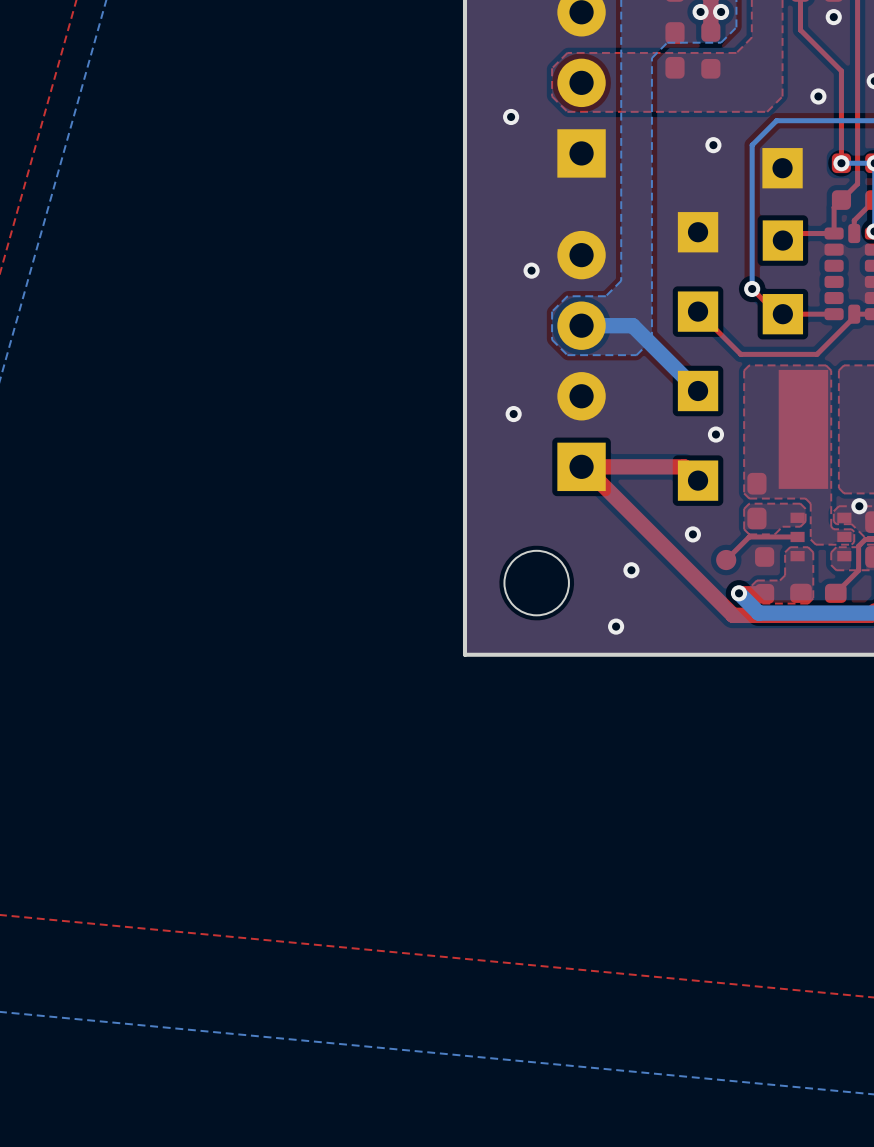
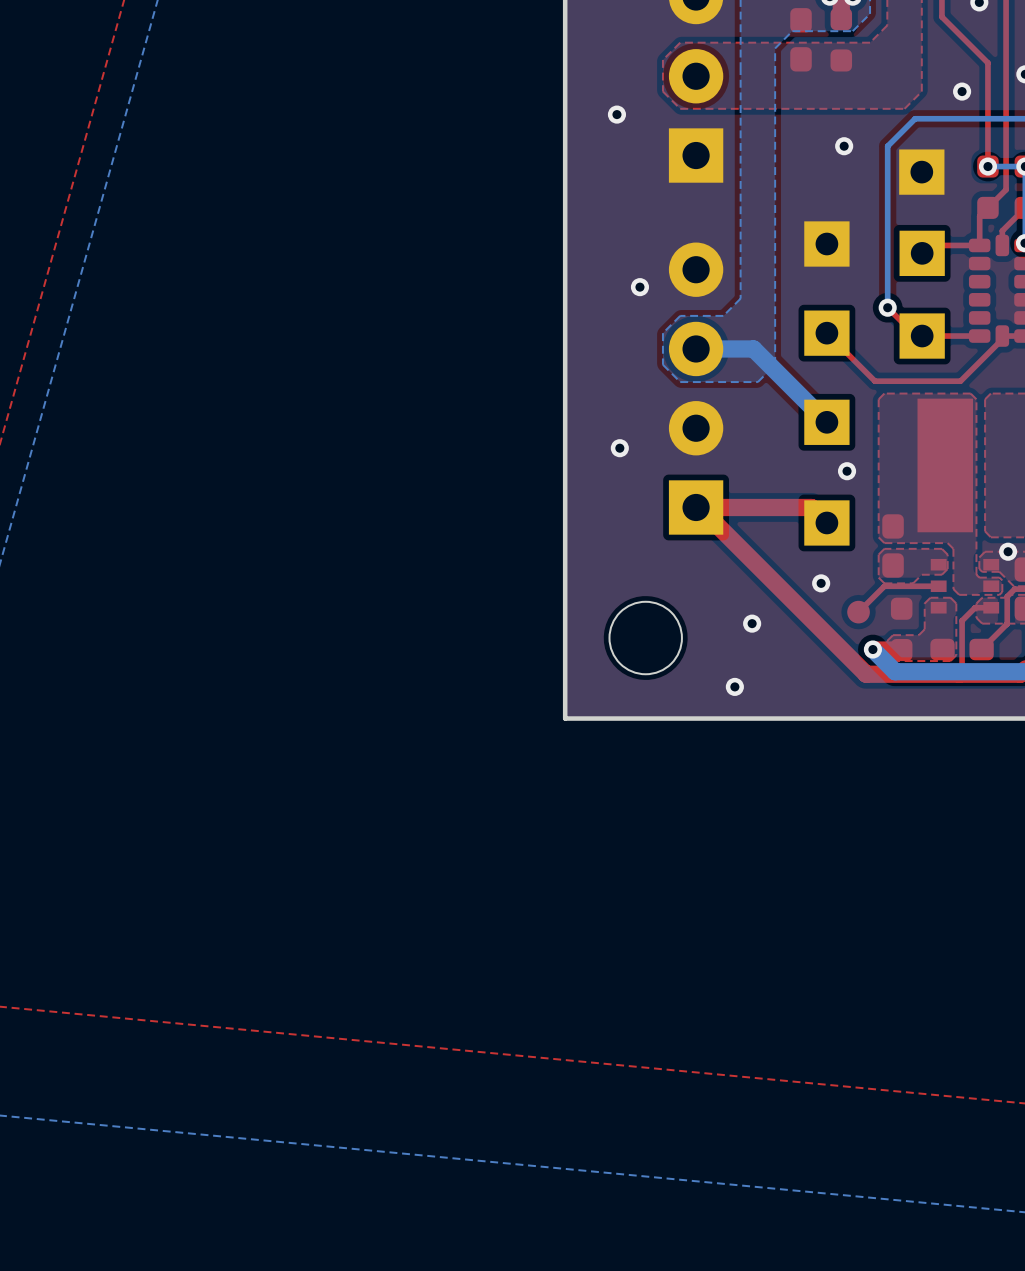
top track: none -> (991, 607) (975, 607) (962, 620) (962, 671) (959, 674)

